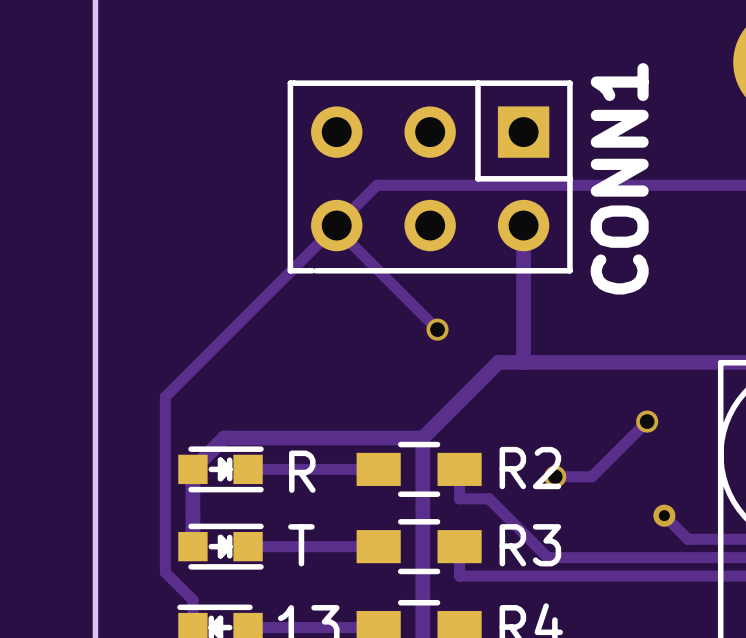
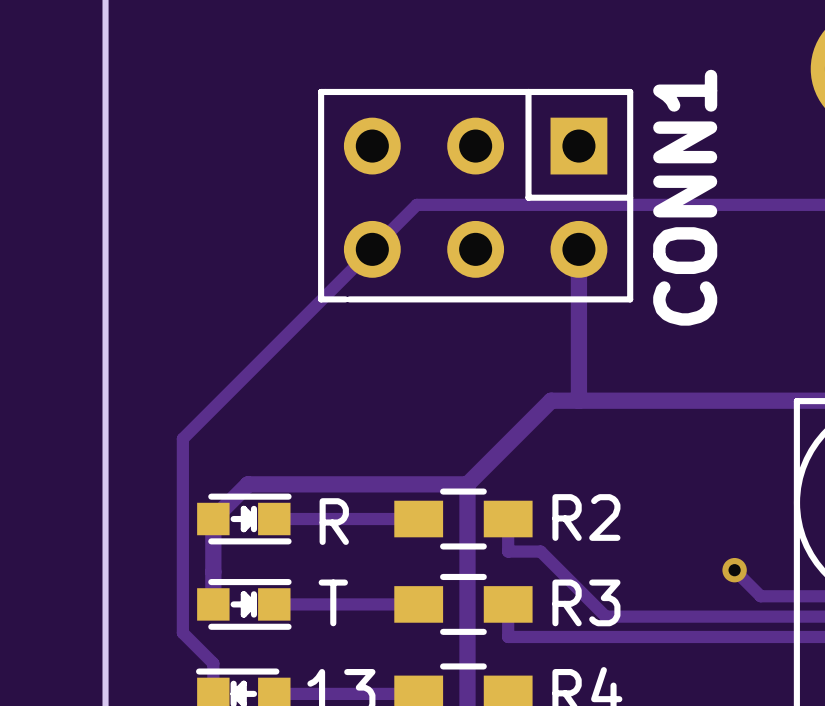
track: (336, 225) (336, 228) (437, 329) -> none
via: (437, 329) -> none
track: (647, 421) (592, 476) (555, 476) -> none
via: (647, 421) -> none
via: (555, 476) -> none

